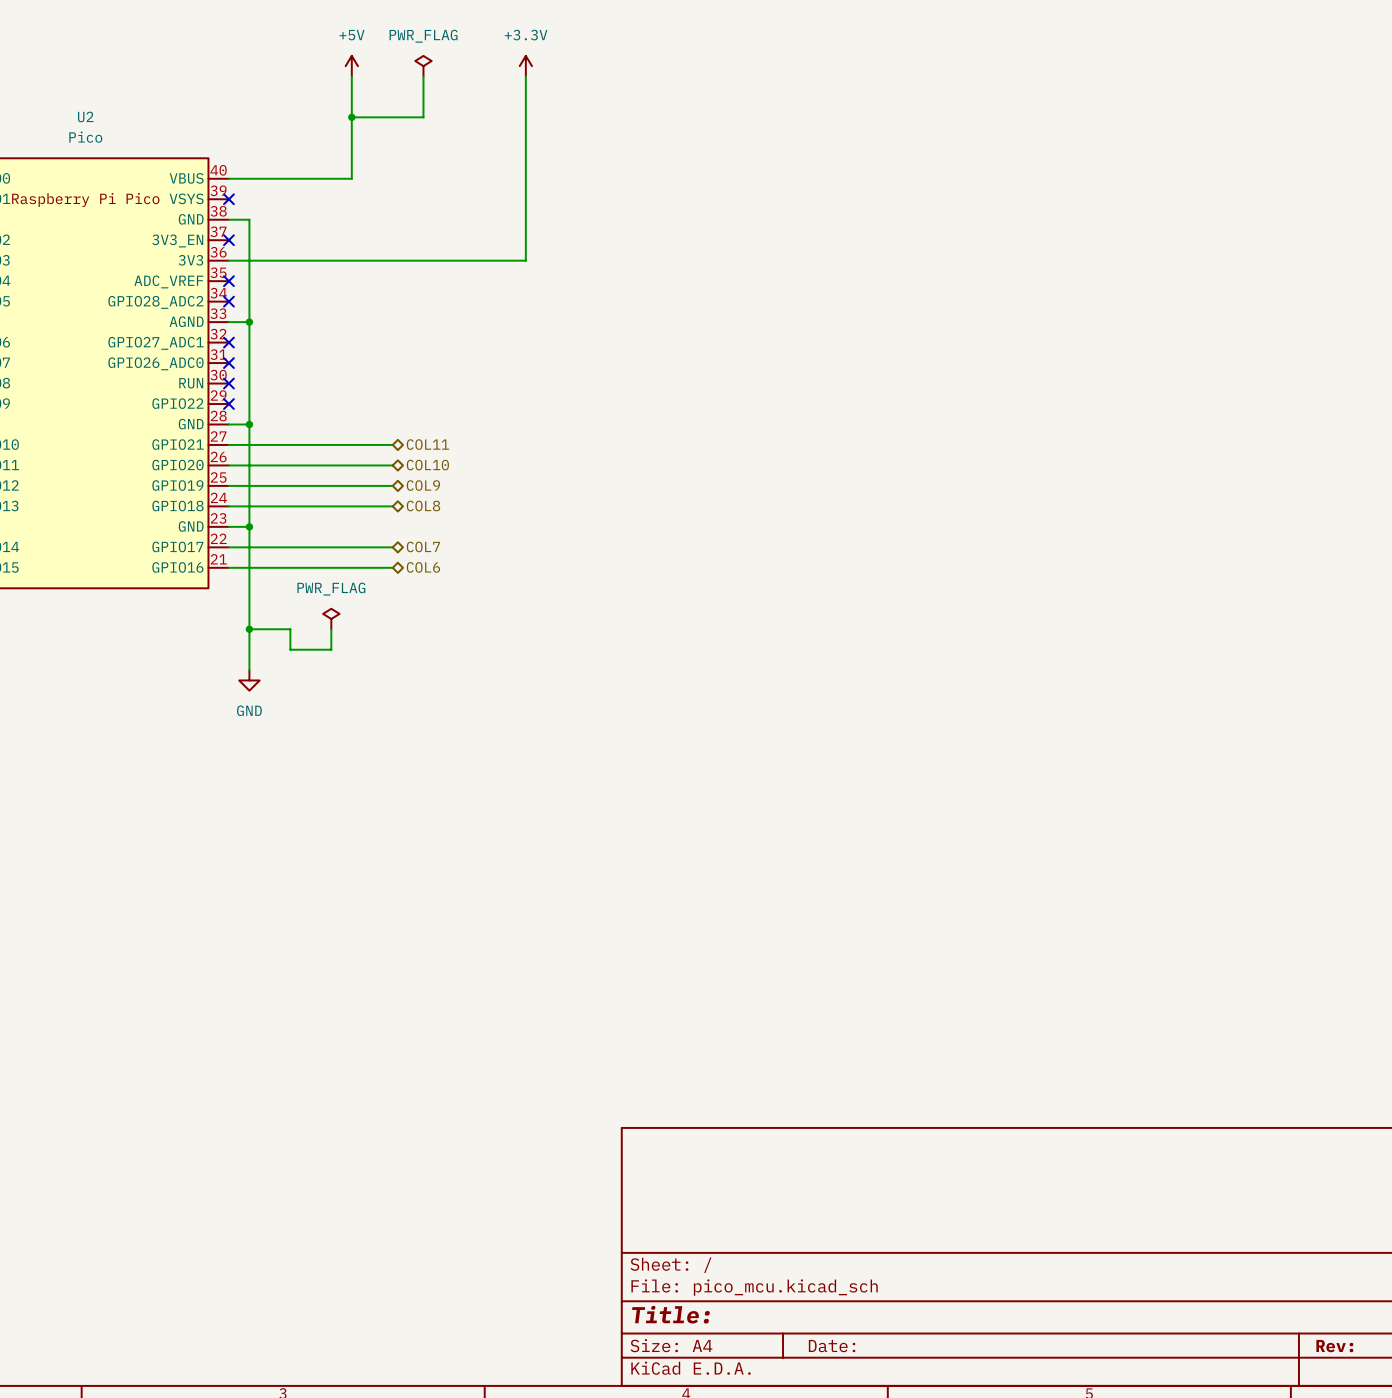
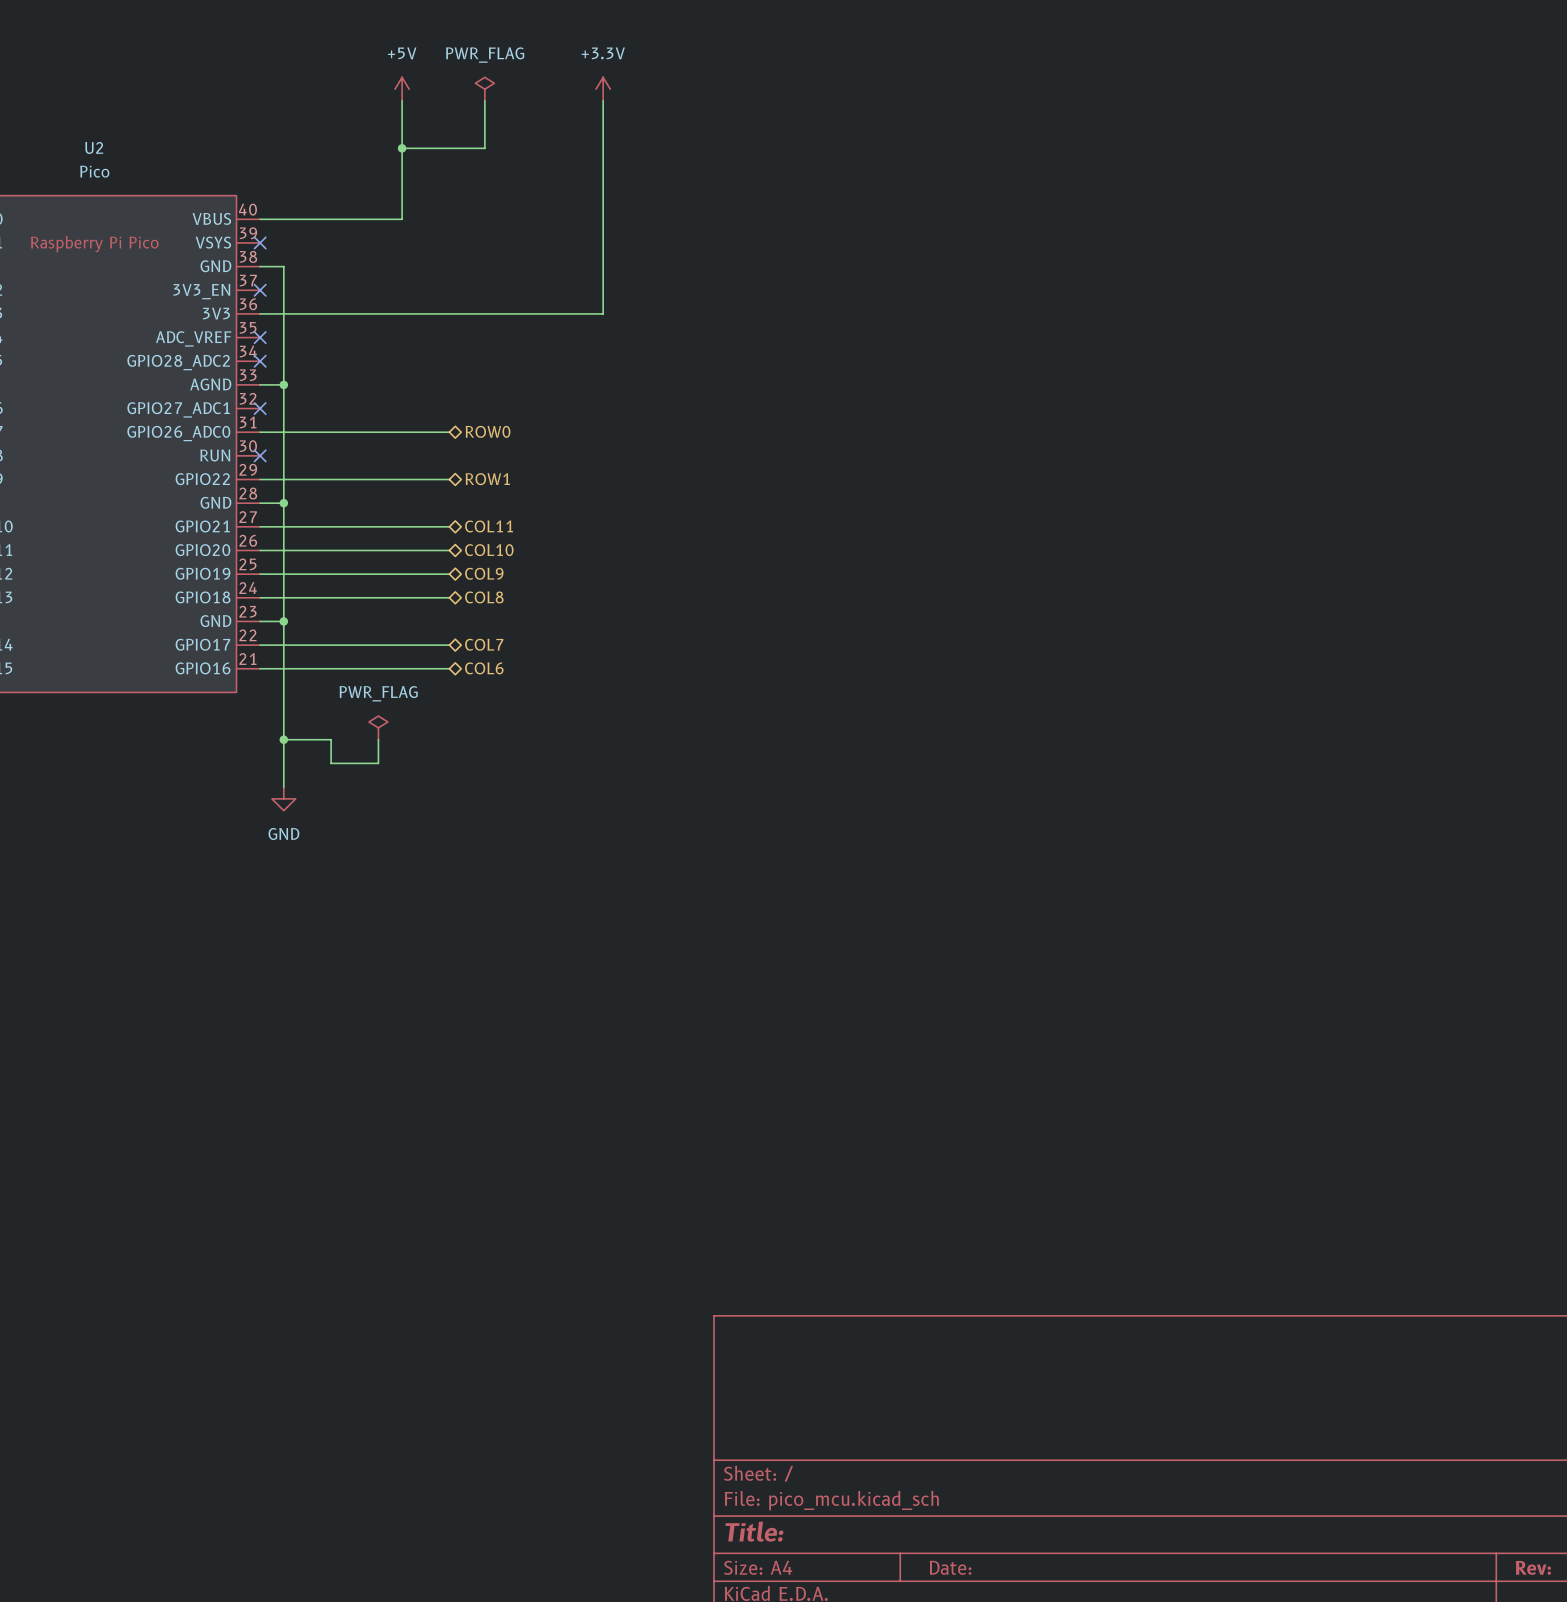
hierarchical label: none -> ROW0 (488, 431)
wire: none -> (260, 432) (449, 432)
no-connect mark: (228, 363) -> none
hierarchical label: none -> ROW1 (487, 479)
wire: none -> (260, 479) (449, 479)
no-connect mark: (228, 404) -> none

